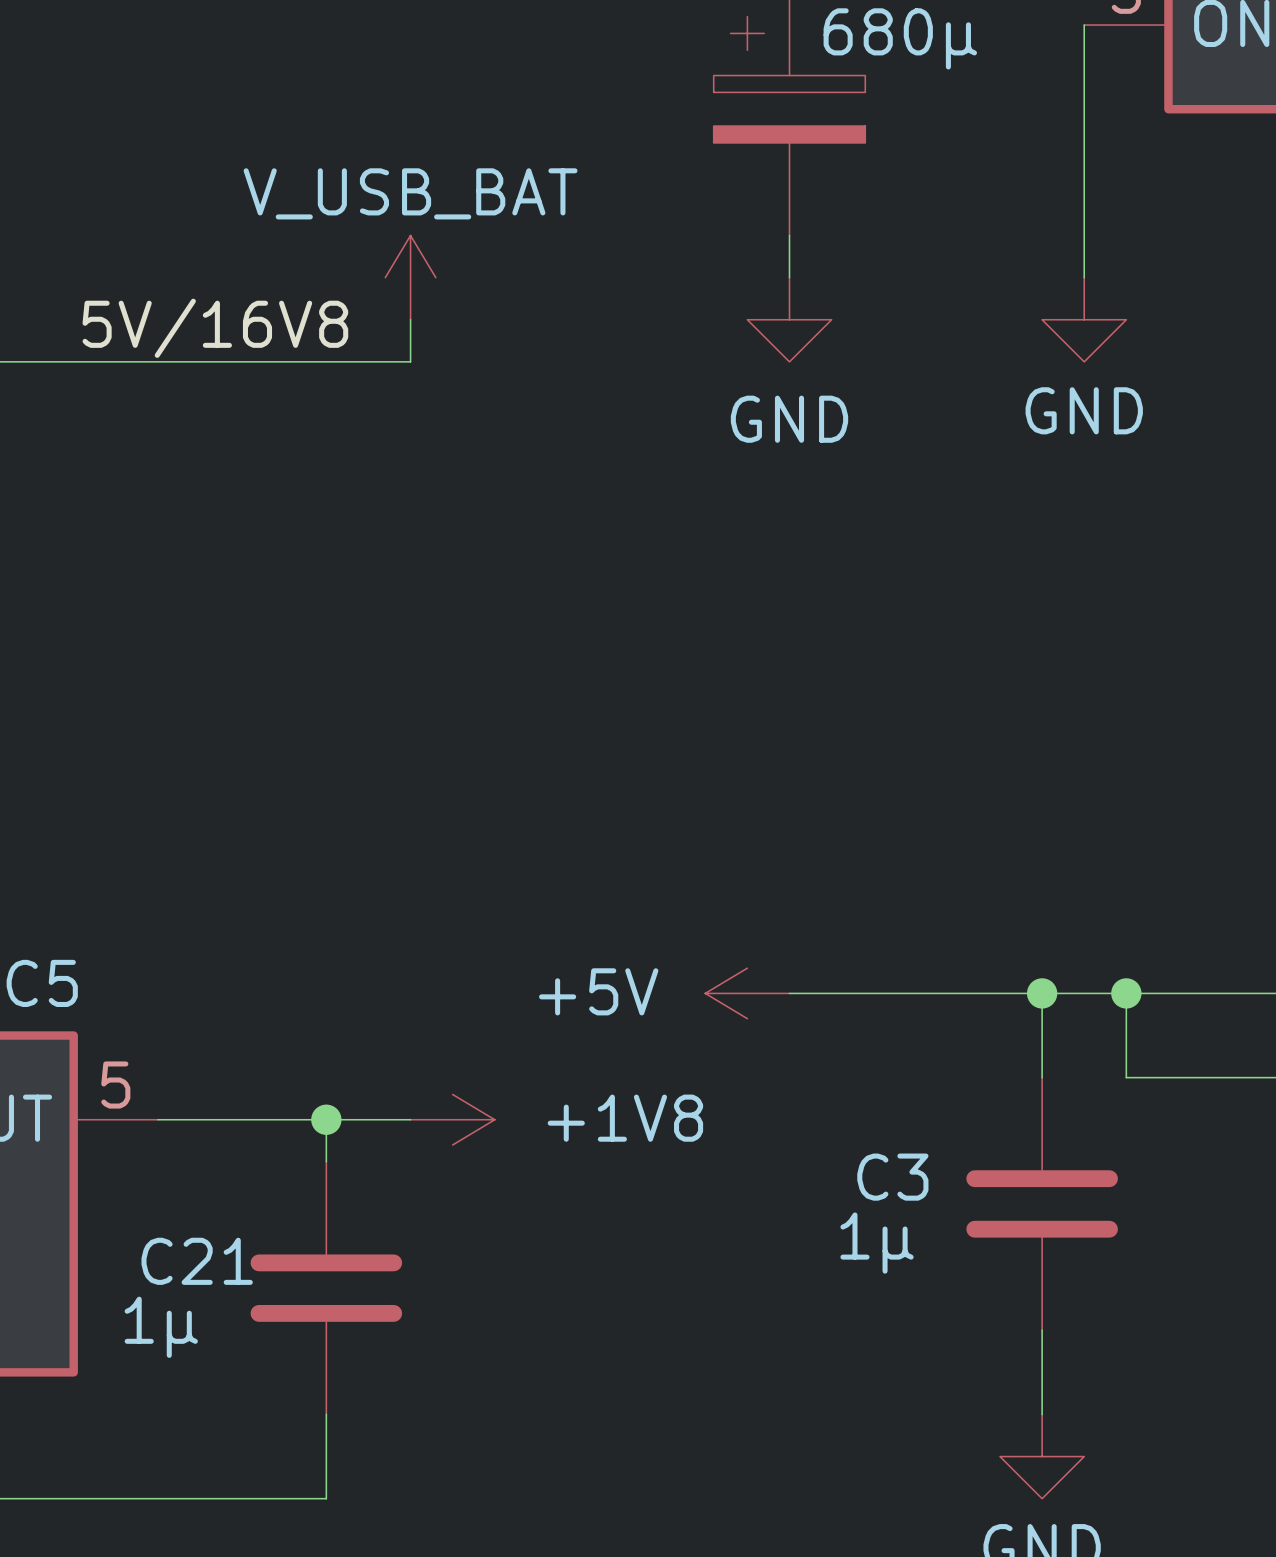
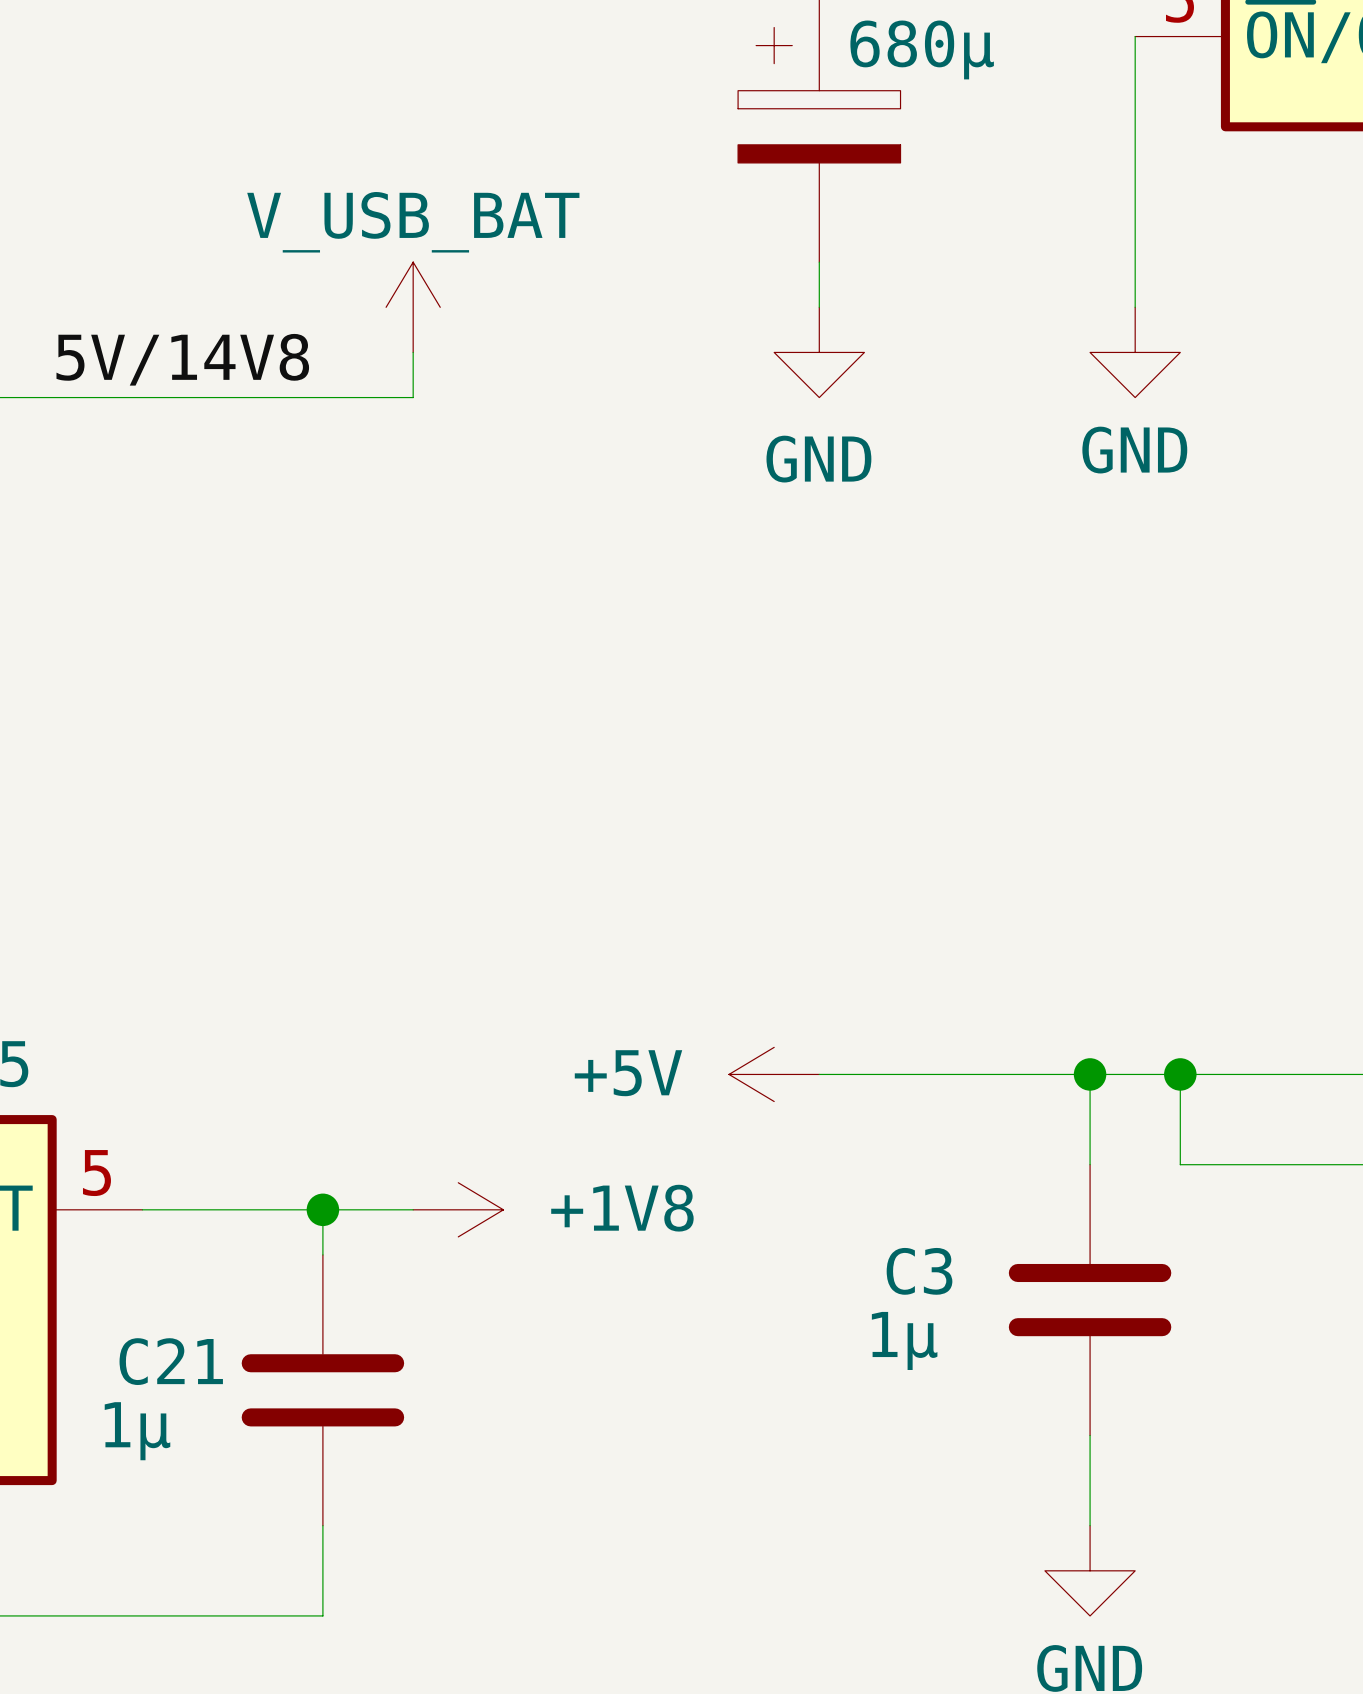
label: 5V/16V8 (215, 328) -> 5V/14V8 (182, 359)

